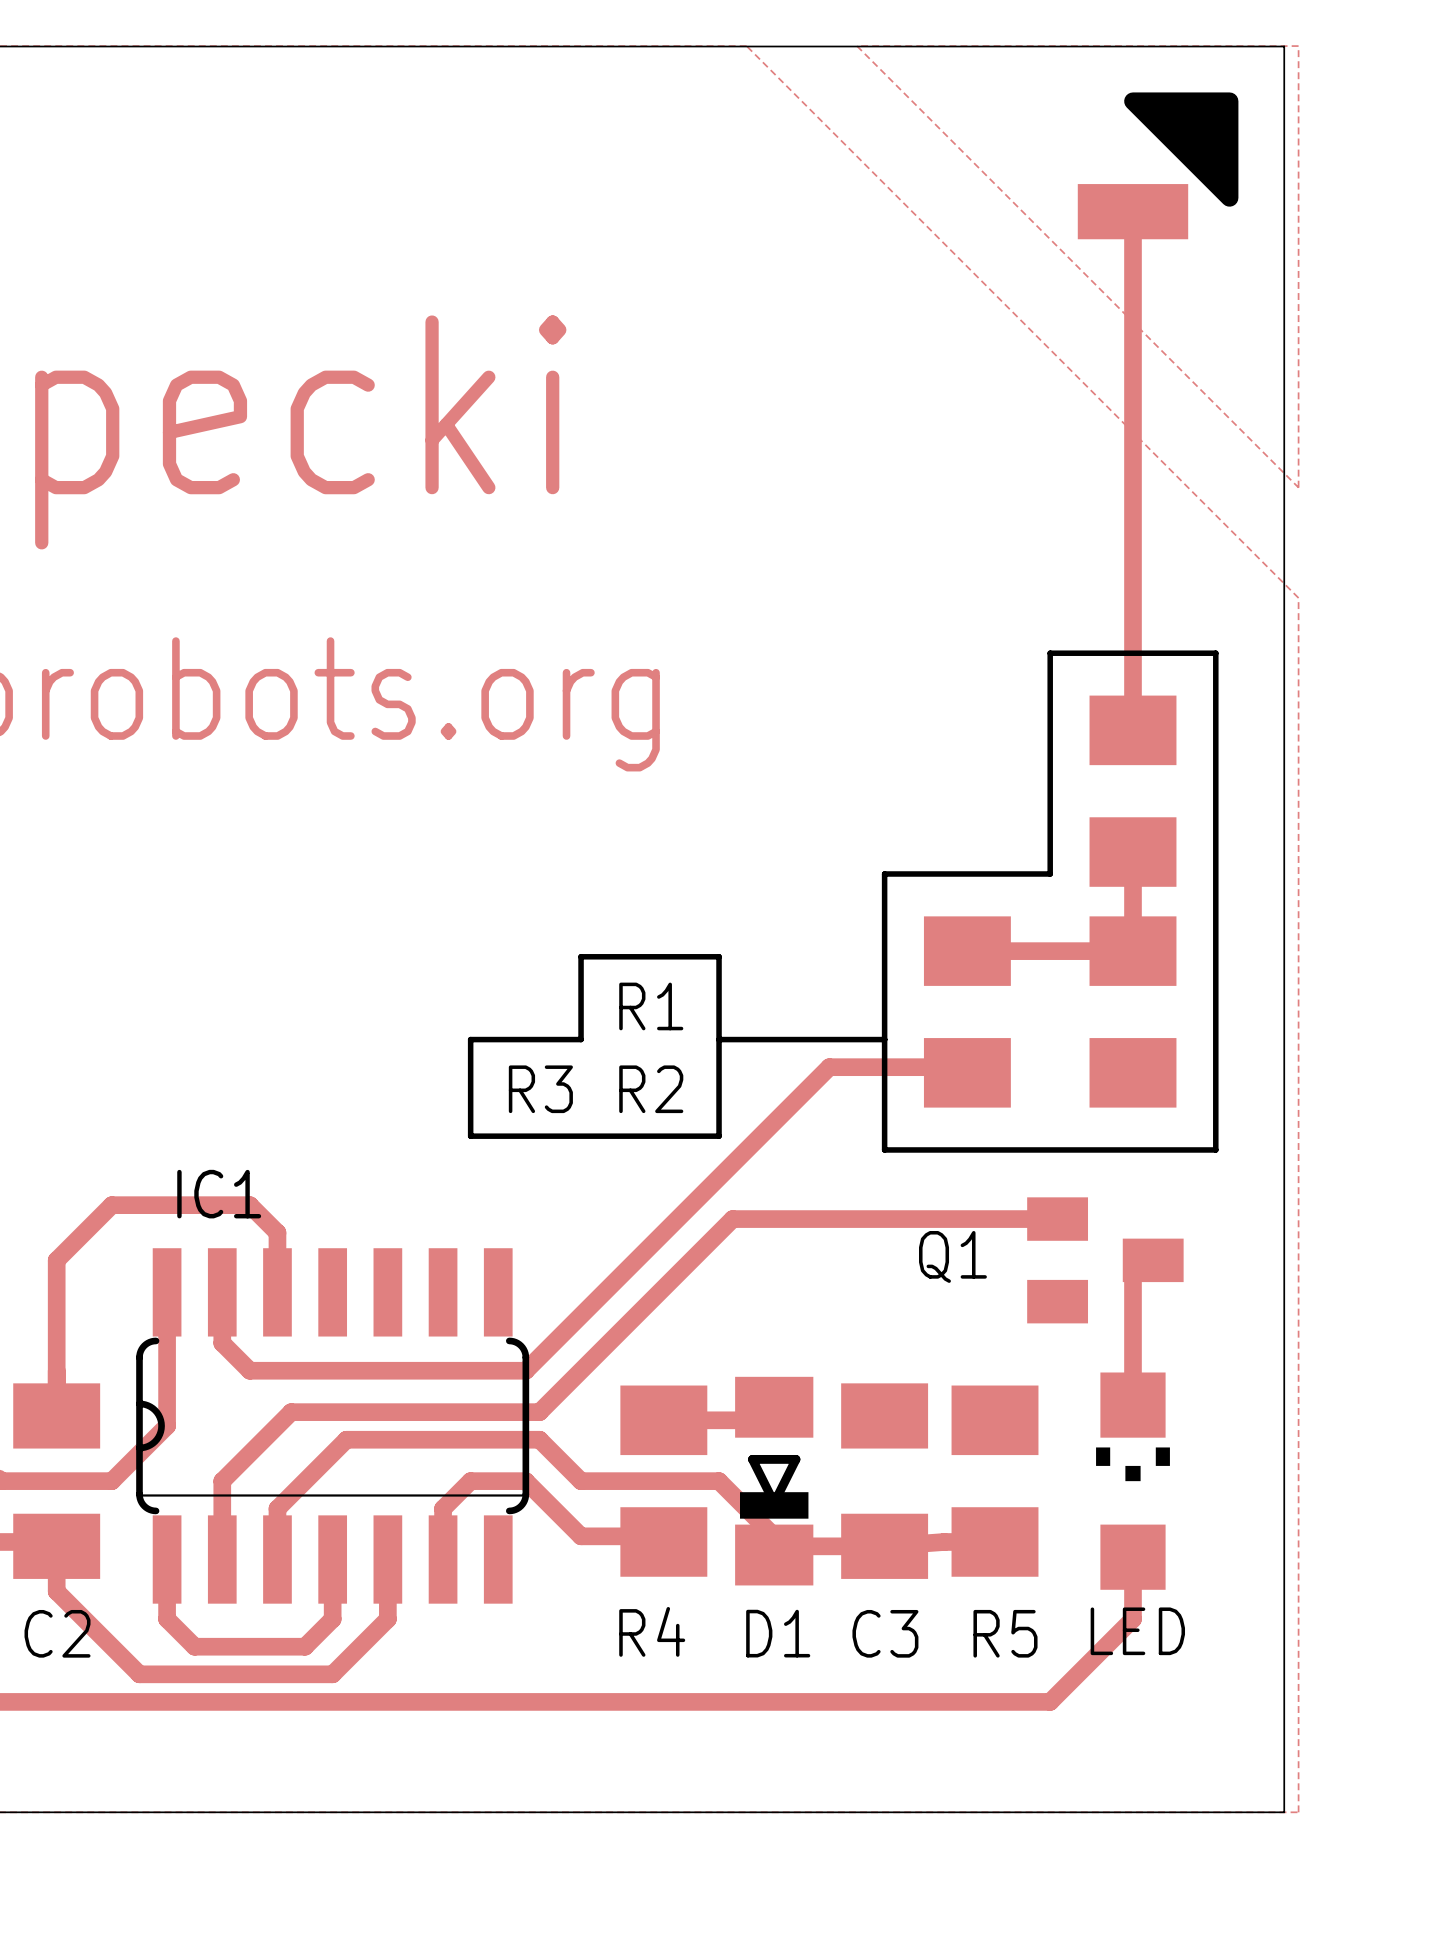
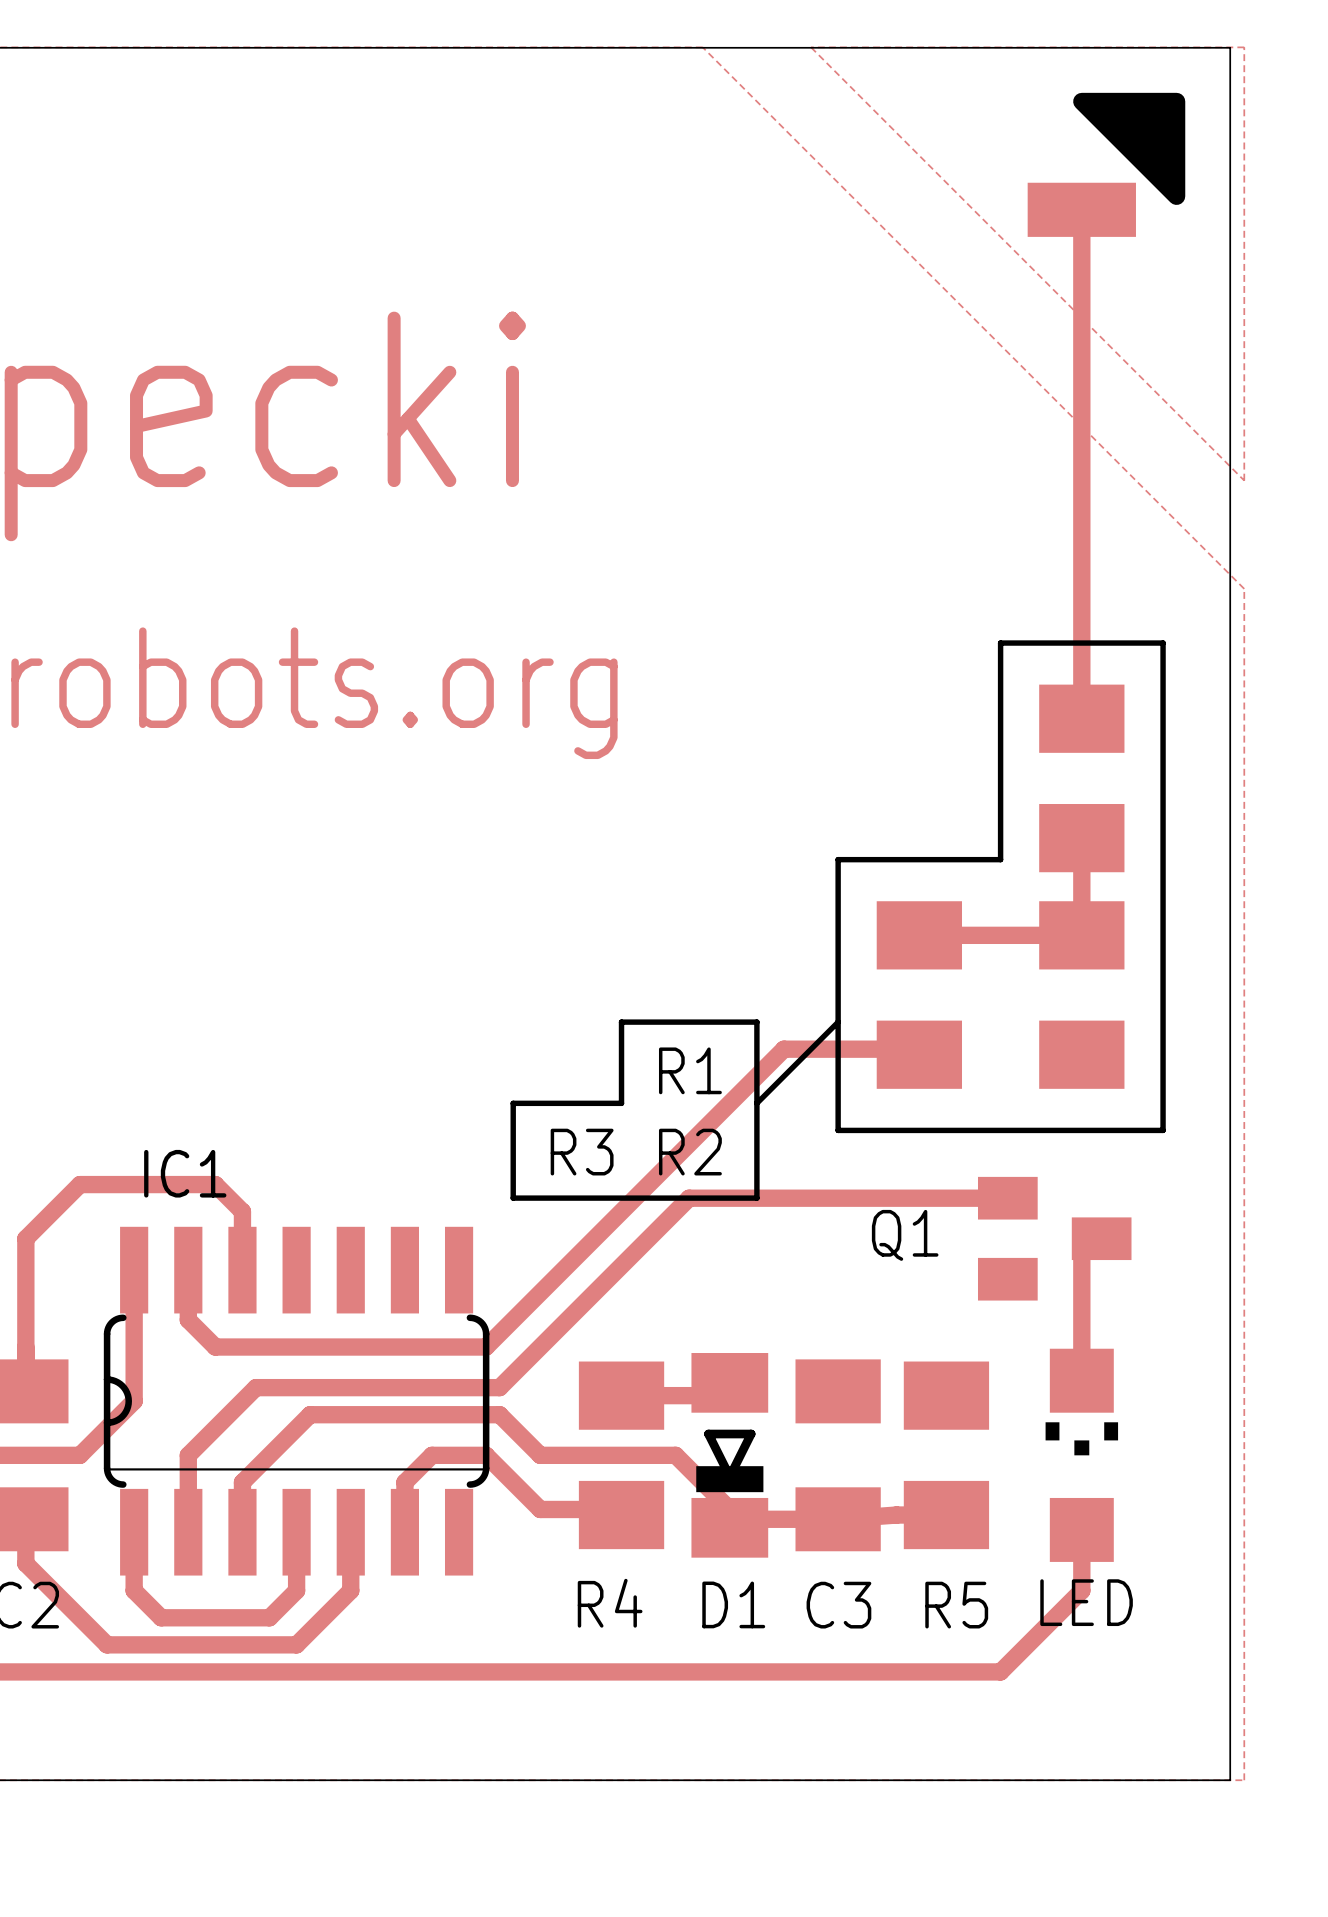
line: (581, 956) (581, 1039) (470, 1039) (470, 1136) (719, 1136) (719, 956) (581, 956) -> none
R1 name position: R1 (651, 1006) -> R1 (690, 1070)
line: none -> (675, 1022) (621, 1022) (621, 1103) (513, 1103) (513, 1198) (756, 1198) (756, 1022)
line: (801, 1039) (884, 1039) -> (756, 1103) (838, 1022)
R3 name position: R3 (540, 1089) -> R3 (582, 1152)
R2 name position: R2 (651, 1089) -> R2 (690, 1152)

